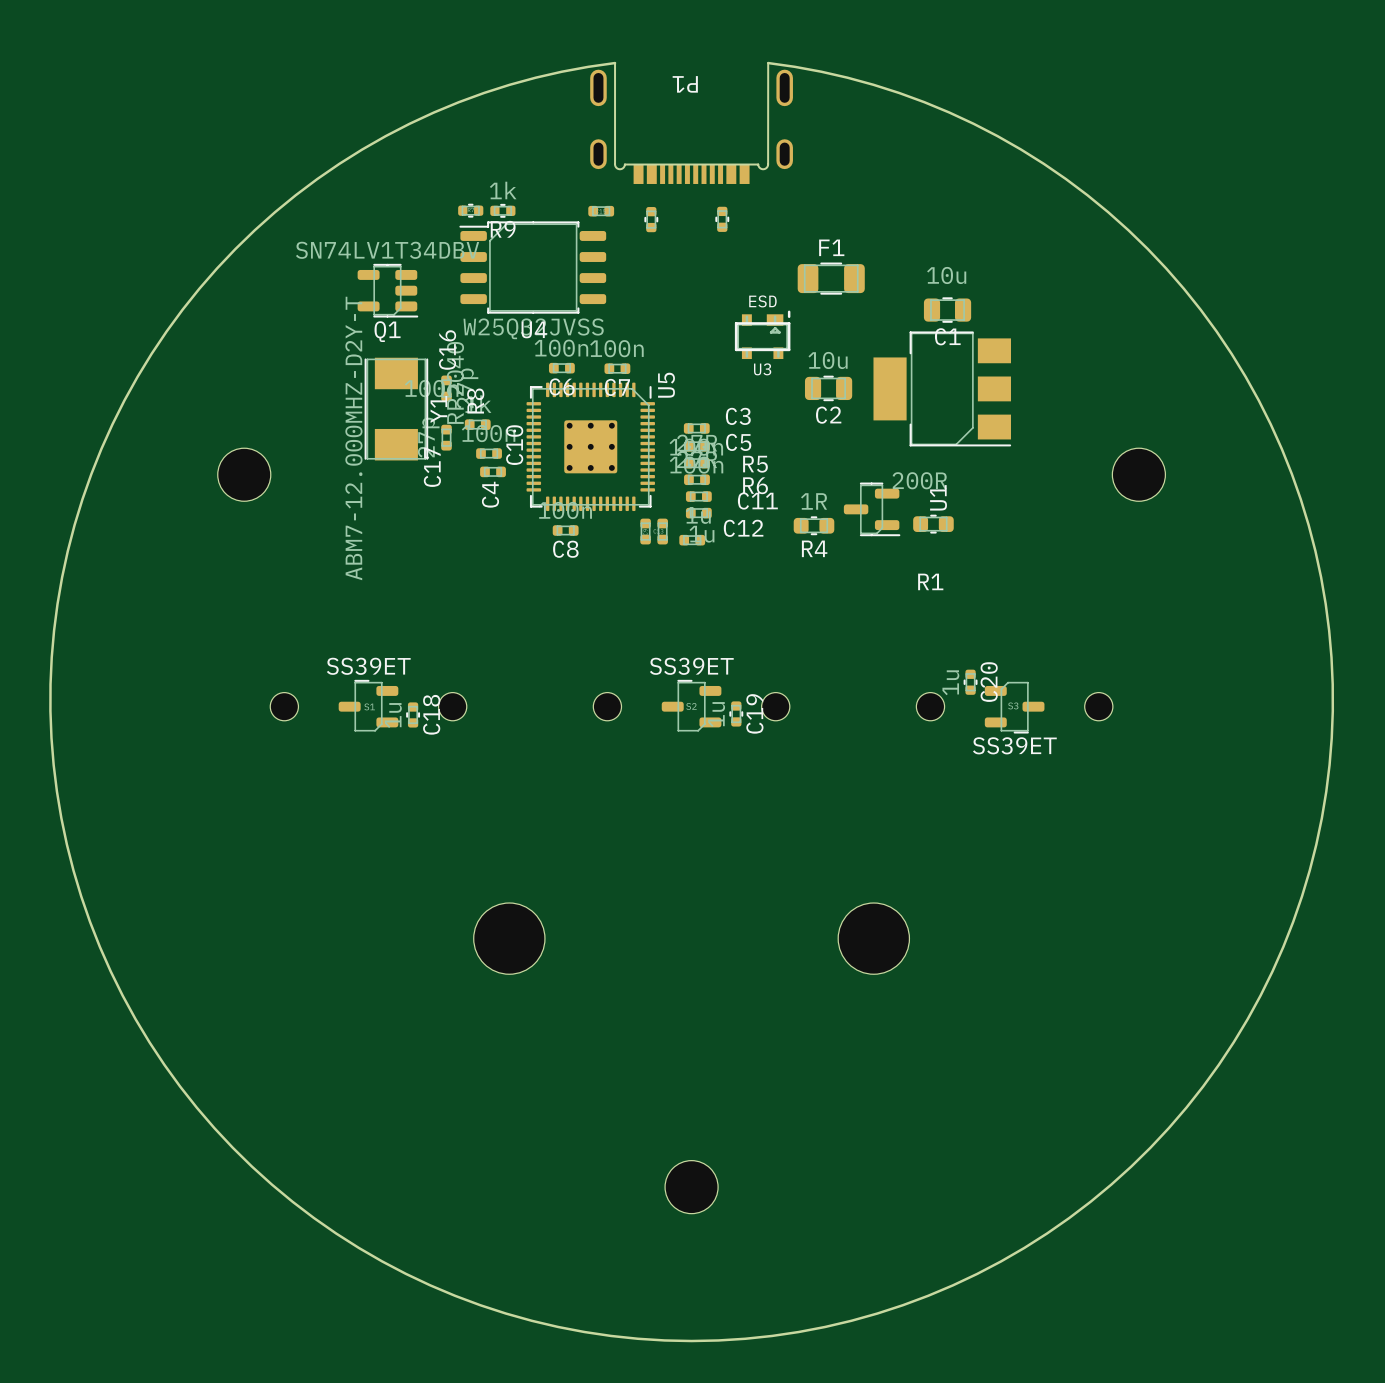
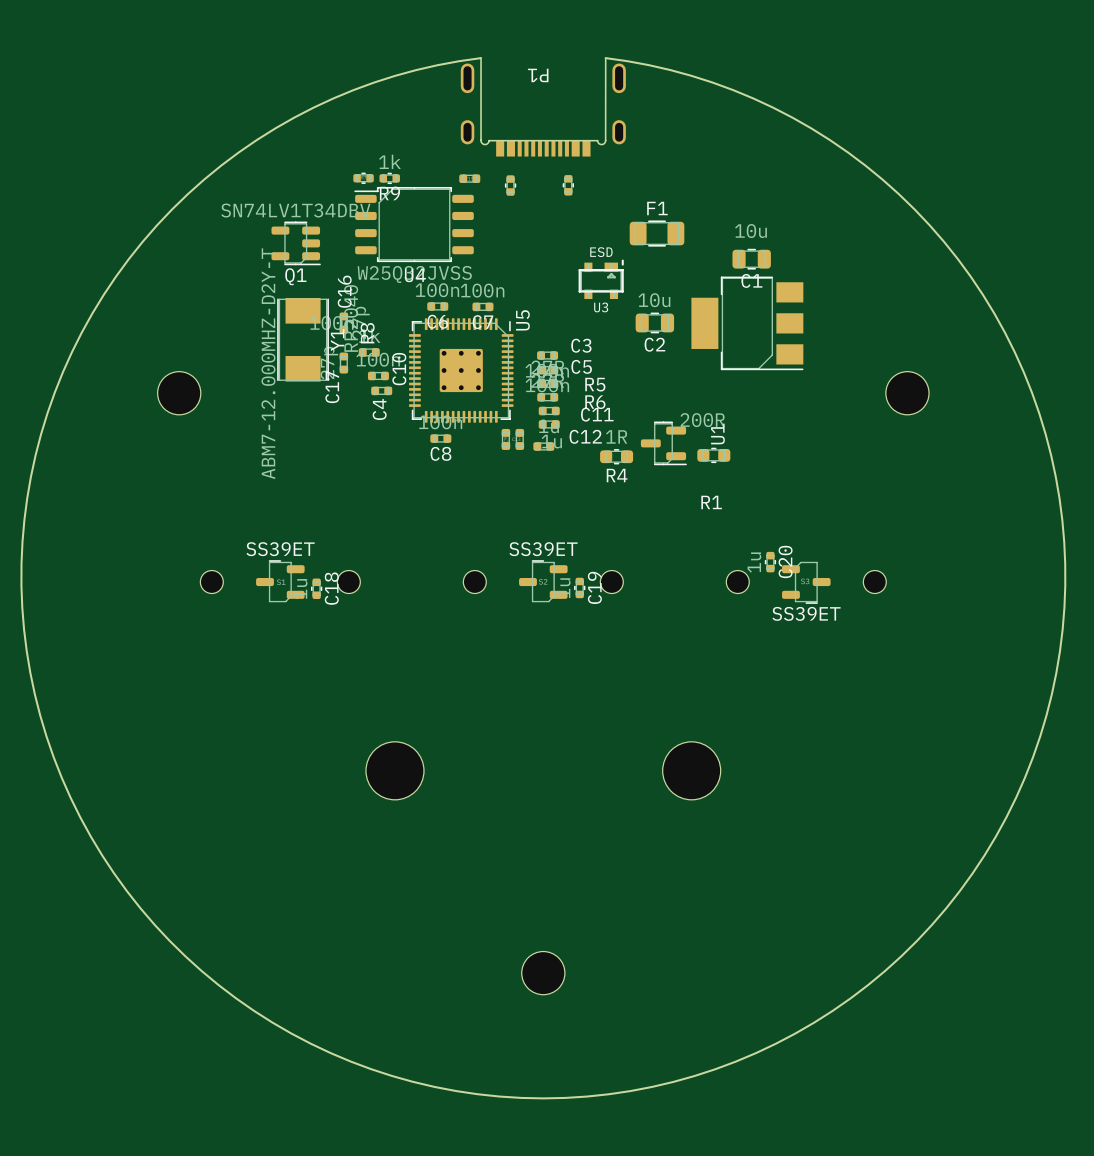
U1 name position: U1 (938, 497) -> U1 (717, 434)
part position: (872, 509) -> (663, 443)
R1 position: (933, 524) -> (713, 455)
R4 position: (814, 525) -> (616, 456)

